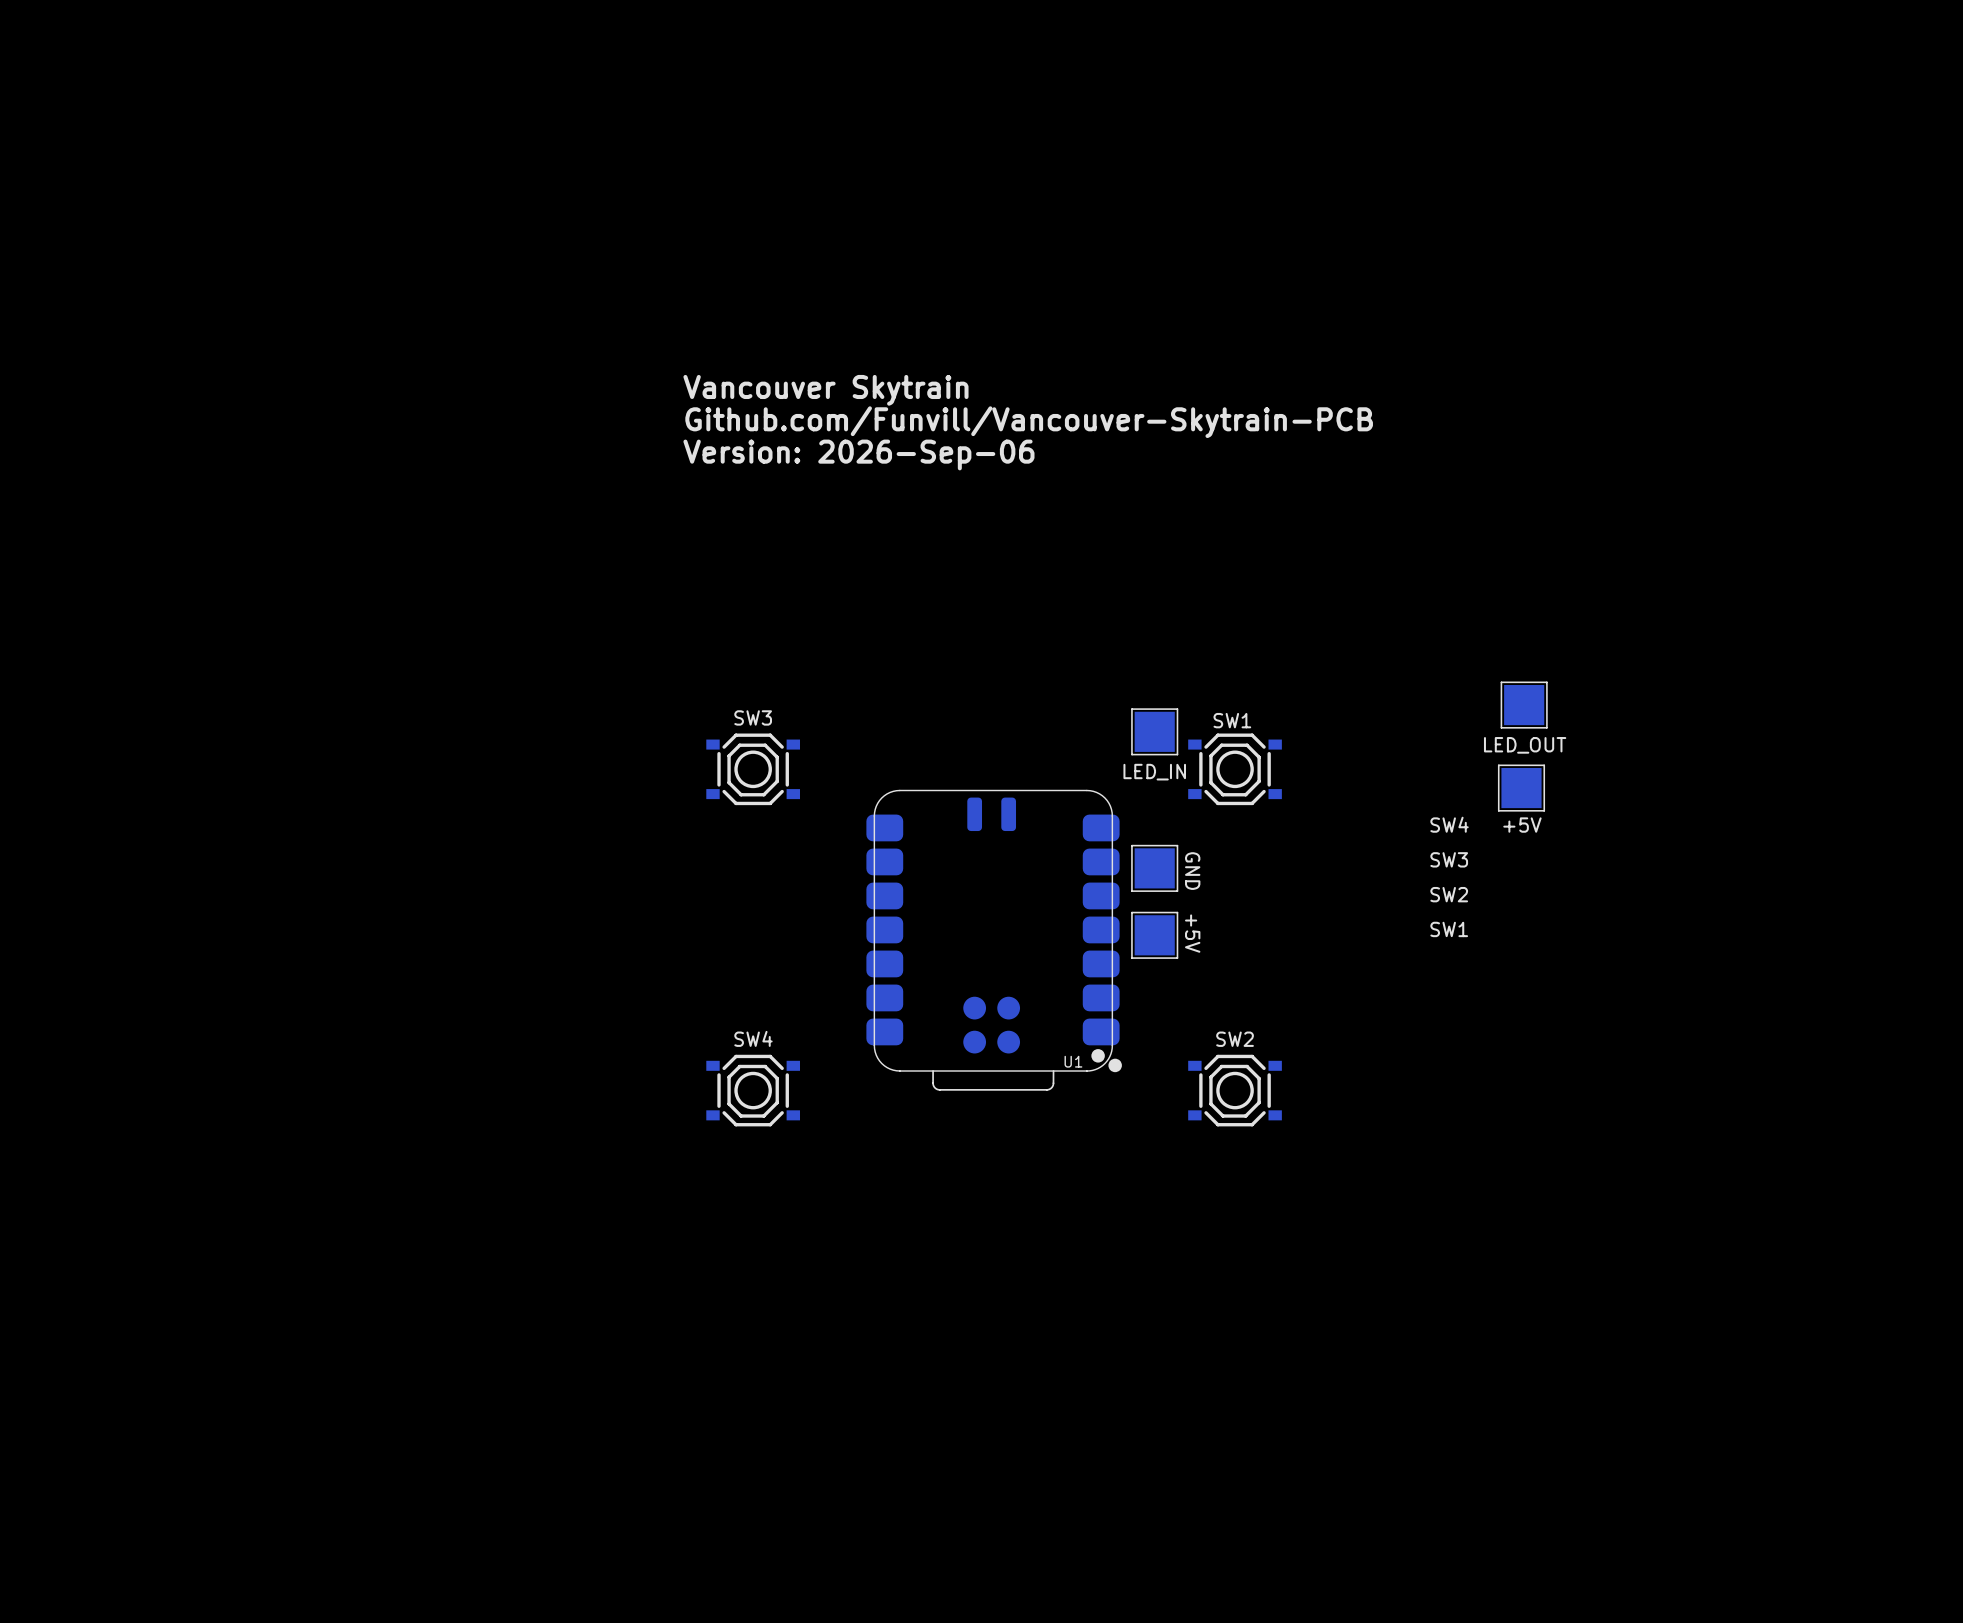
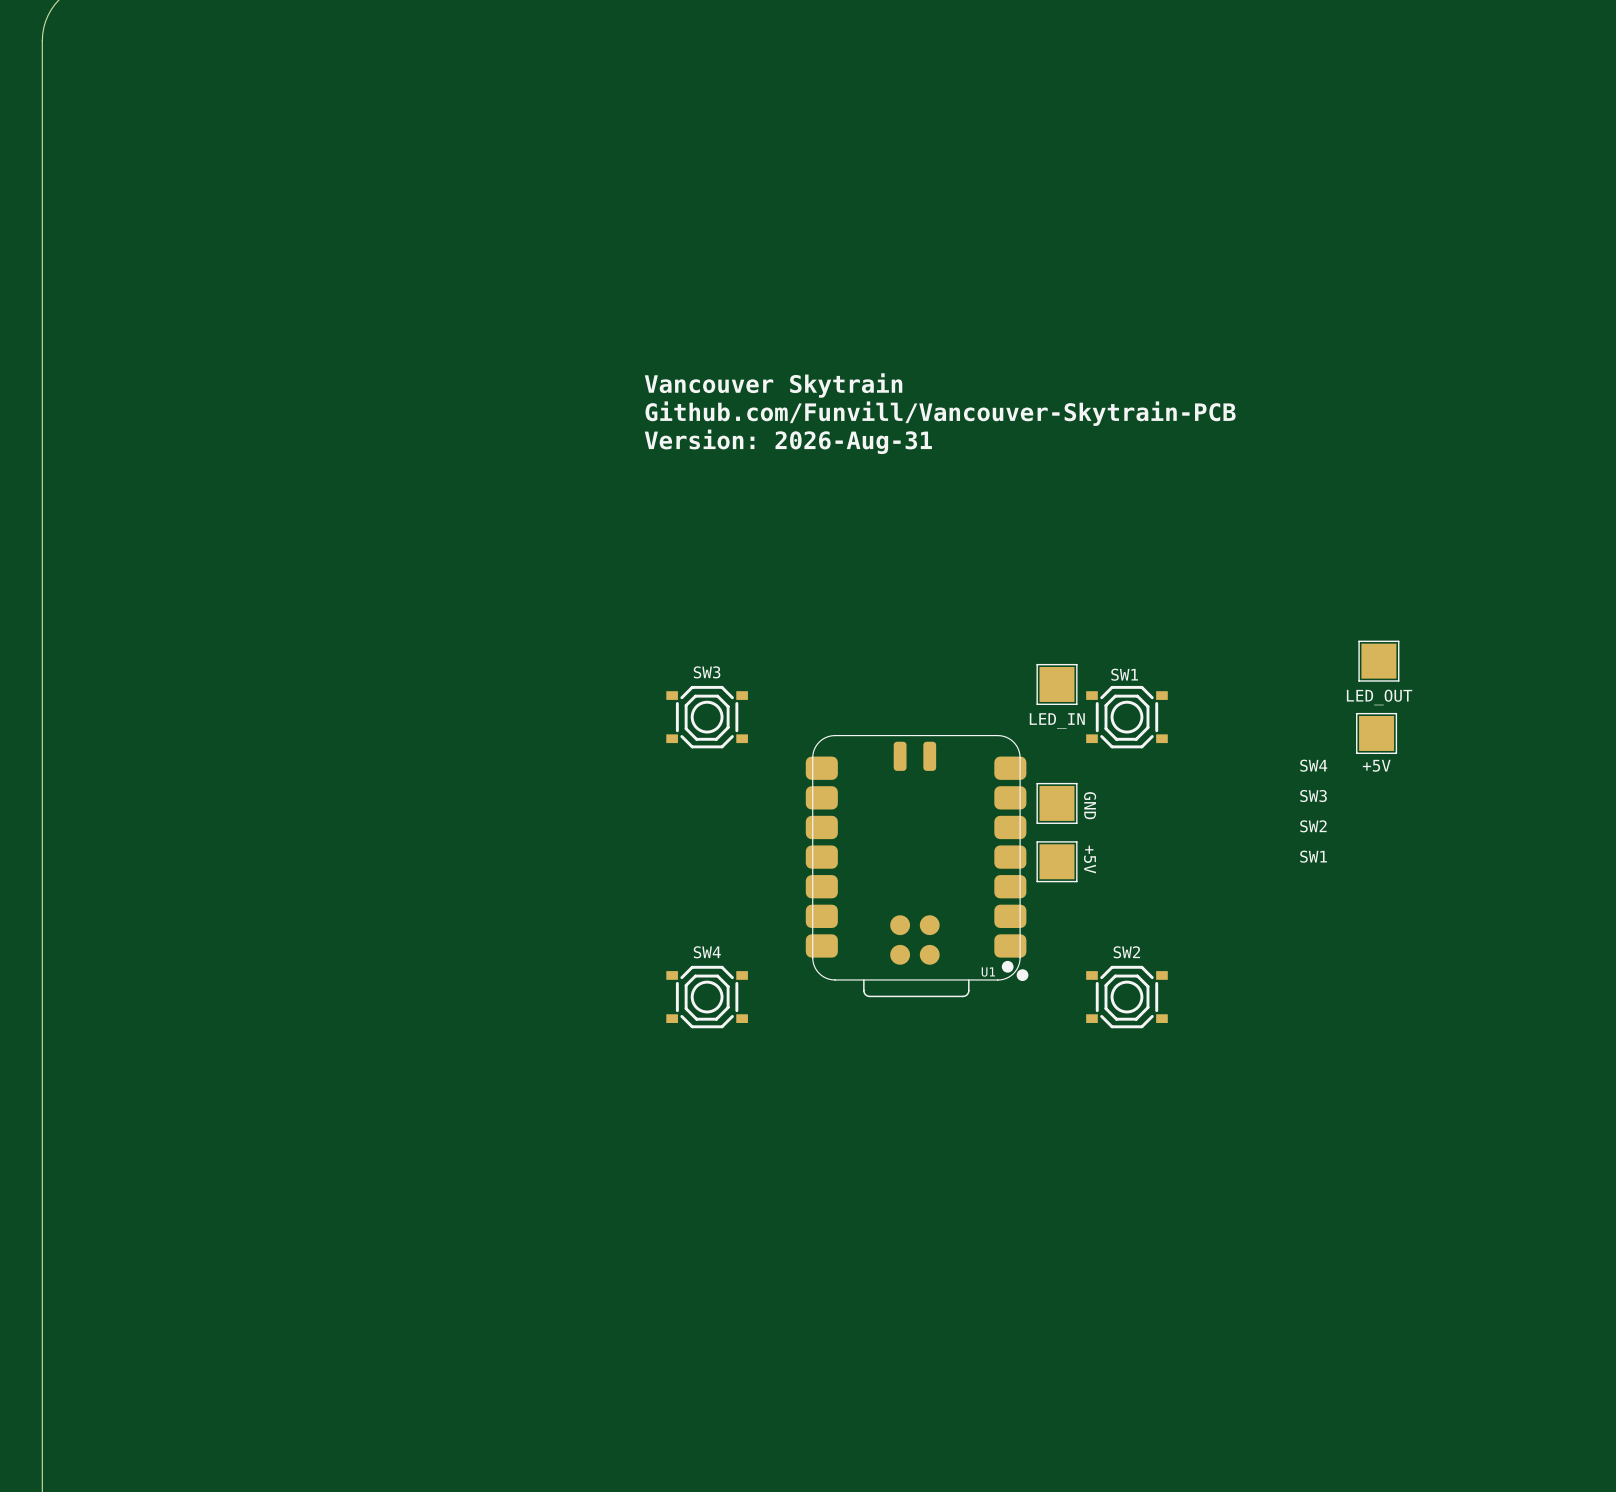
text: Version: 2026-Sep-06 (858, 454) -> Version: 2026-Aug-31 (788, 441)

